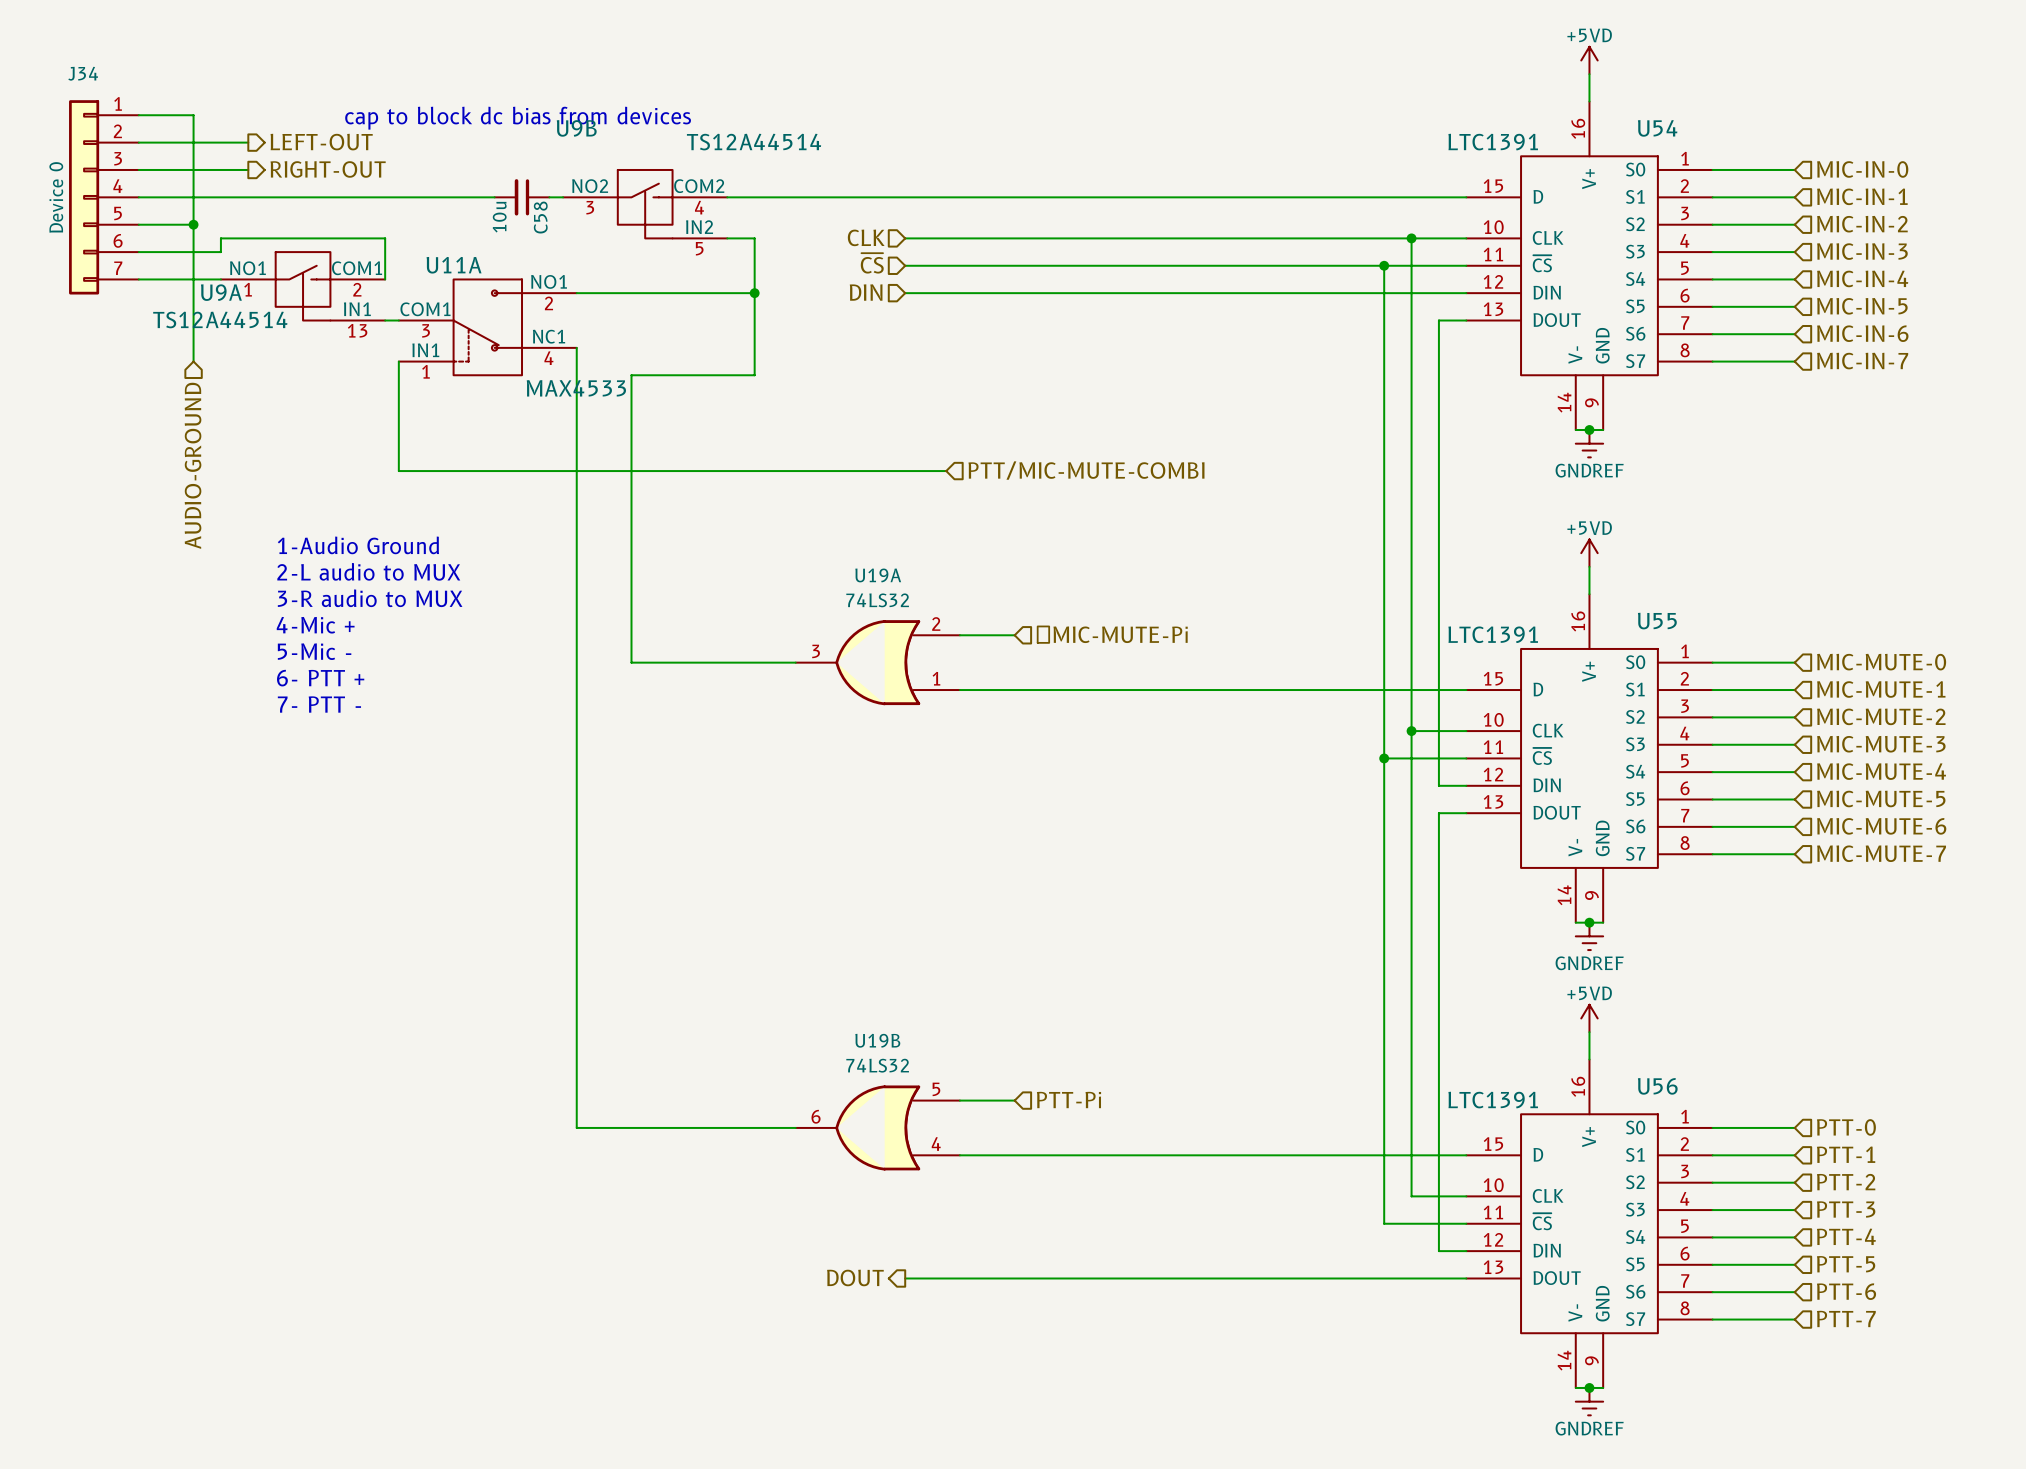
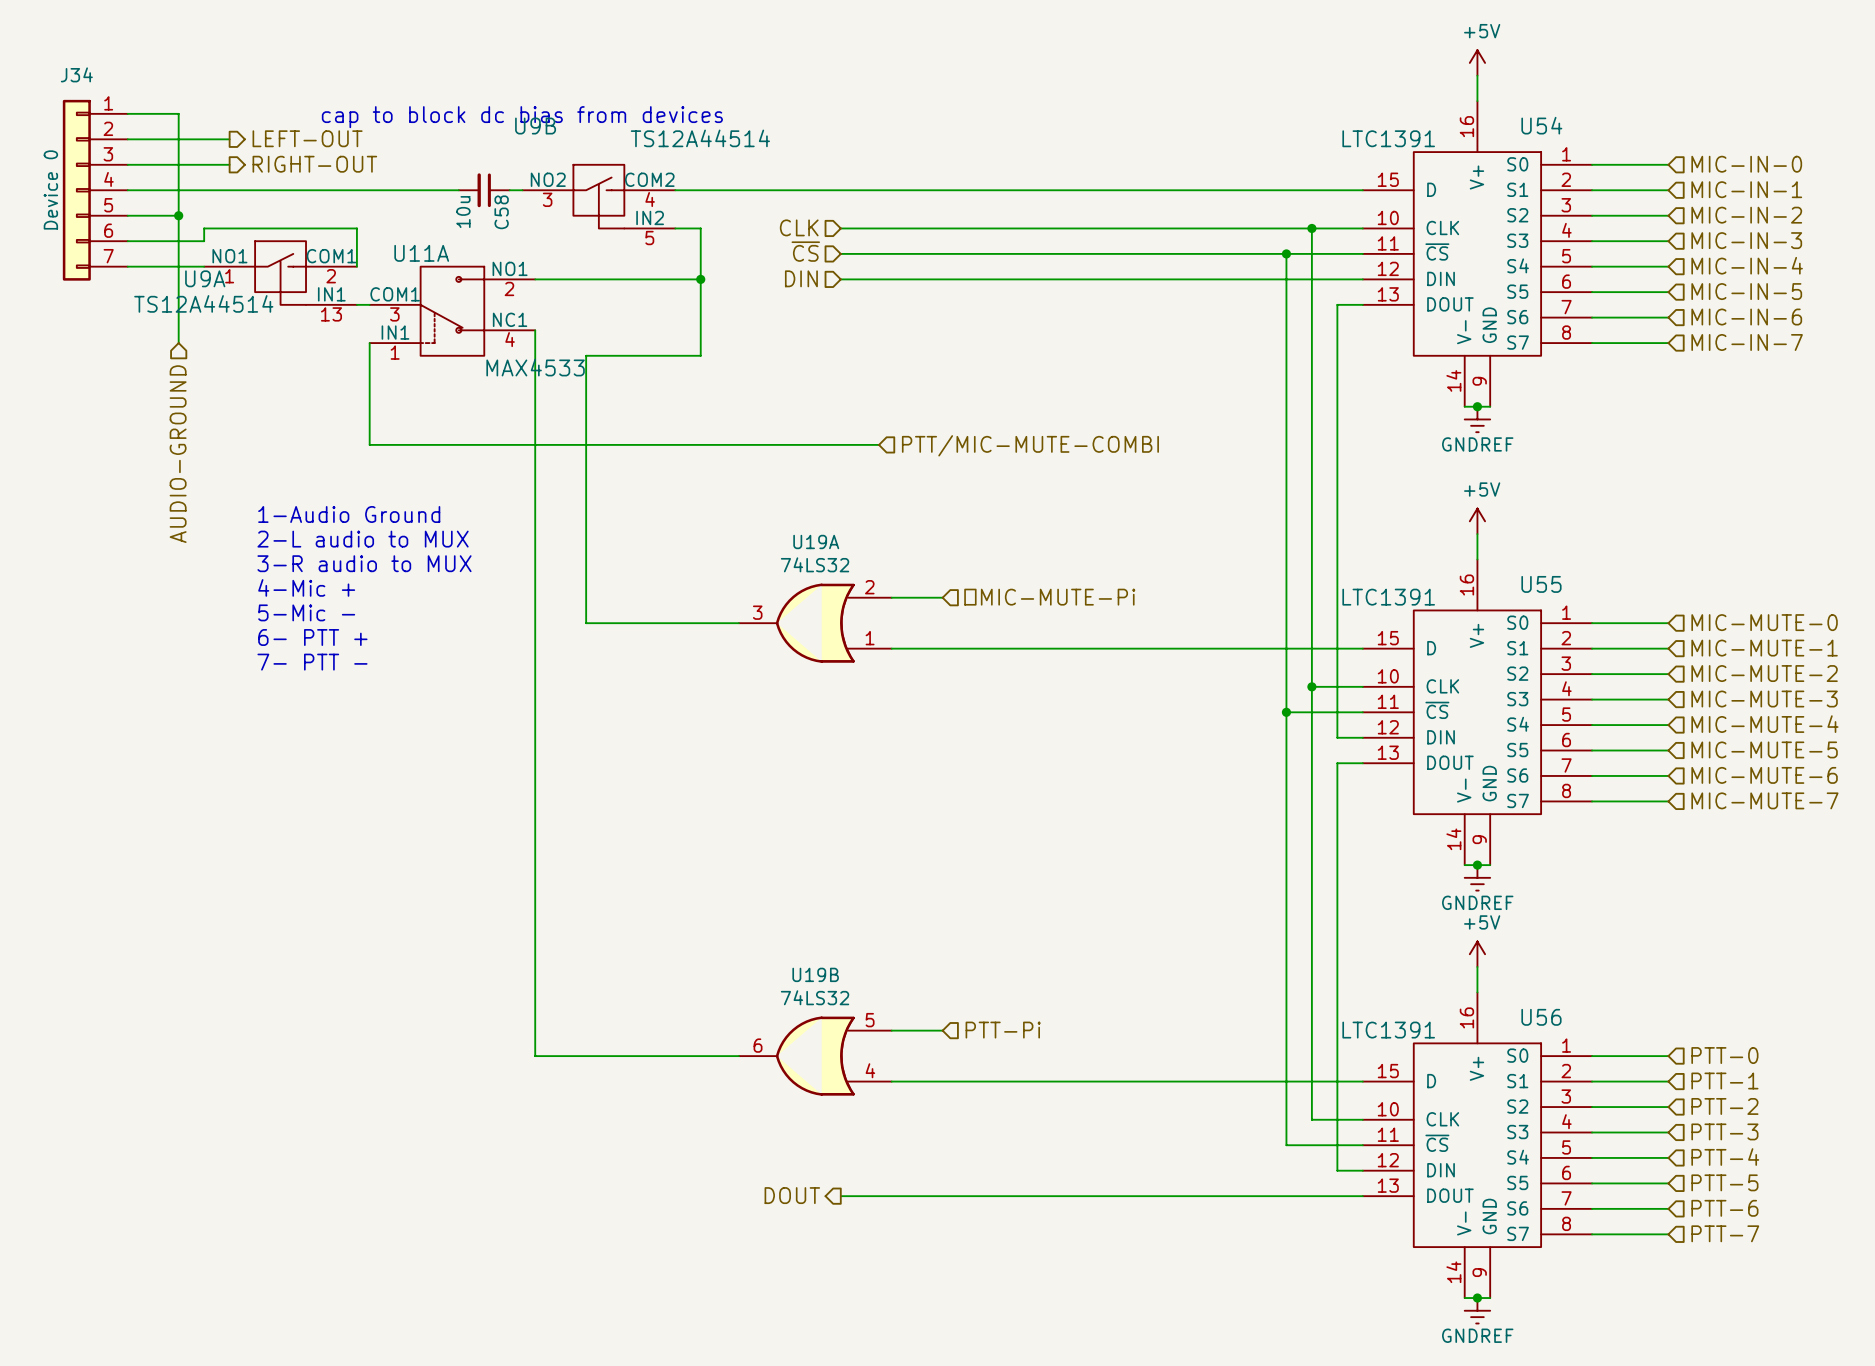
power symbol: +5VD (1589, 60) -> +5V (1477, 62)
power symbol: +5VD (1589, 553) -> +5V (1477, 521)
power symbol: +5VD (1589, 1018) -> +5V (1477, 954)

